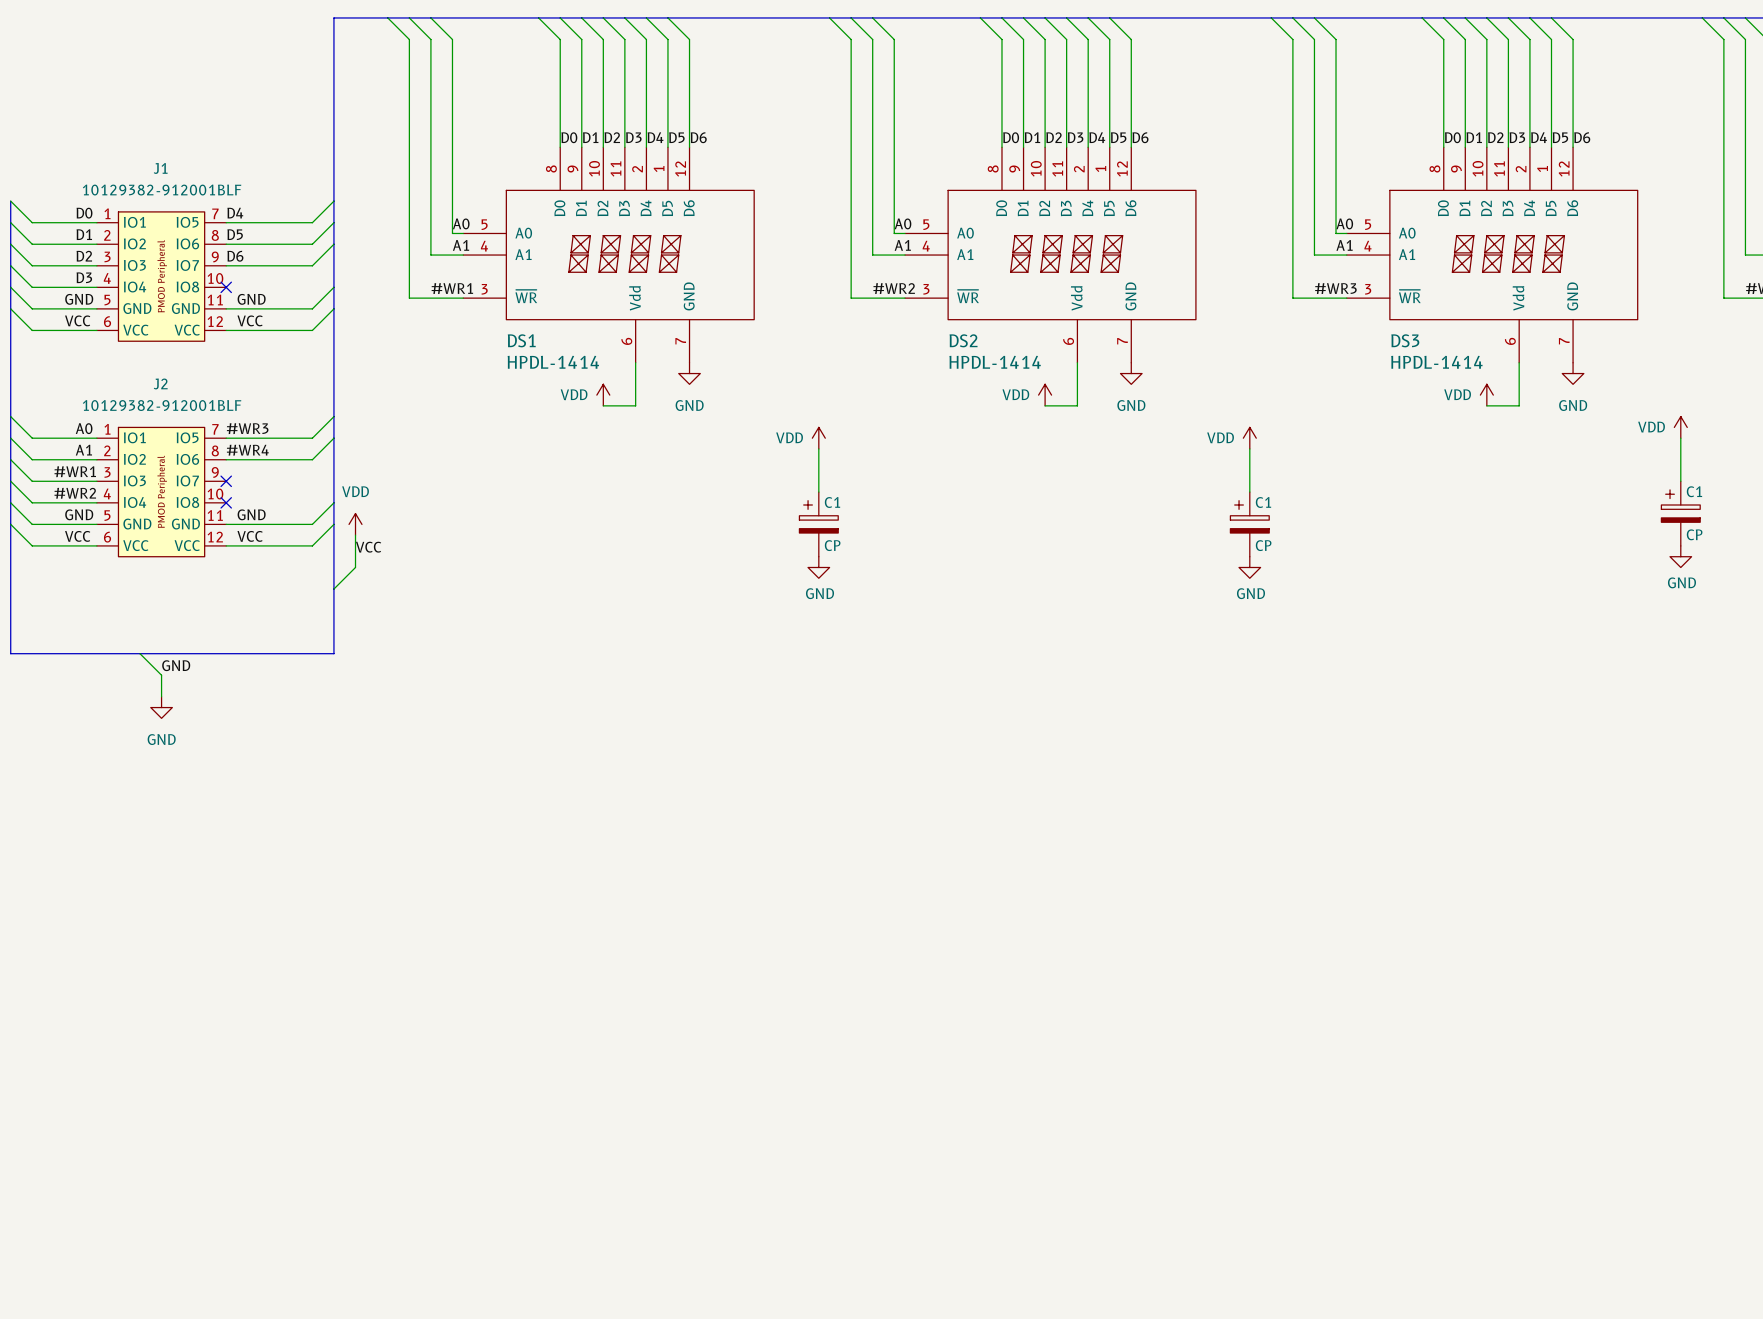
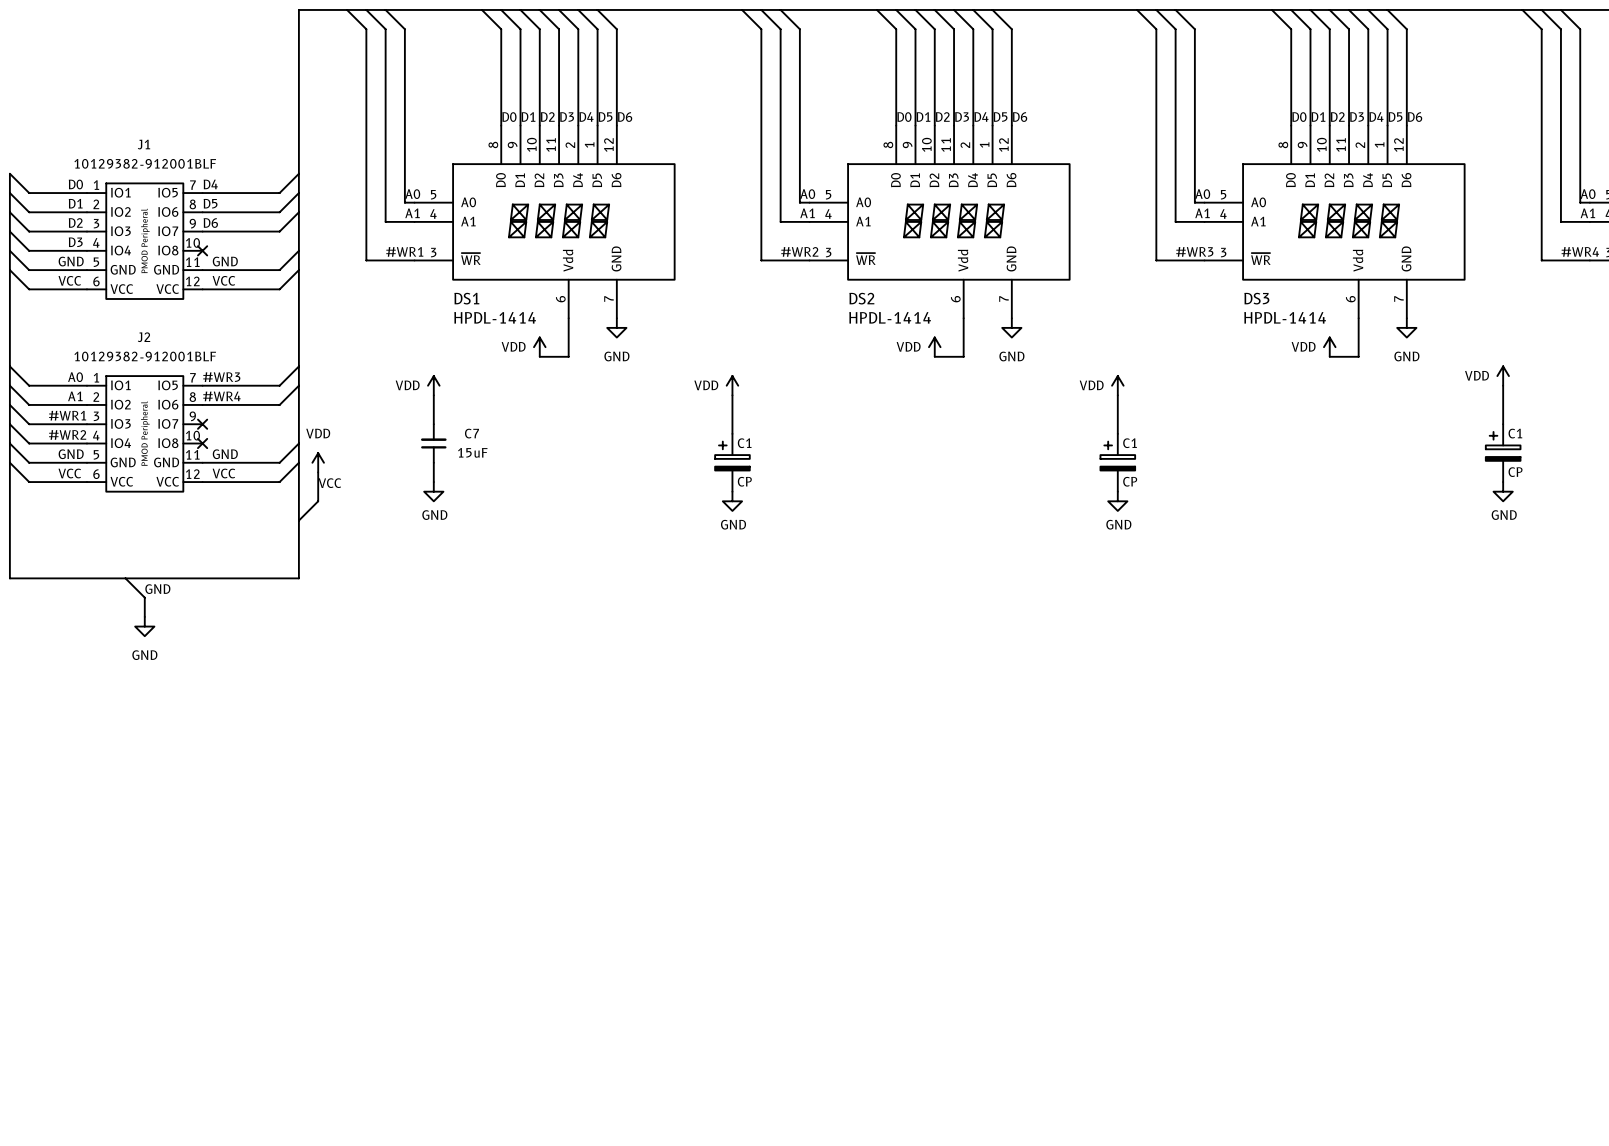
power symbol: none -> VDD (433, 385)
wire: none -> (433, 395) (433, 424)
C7: none -> 15uF (433, 443)
wire: none -> (433, 462) (433, 482)
power symbol: none -> GND (433, 491)

